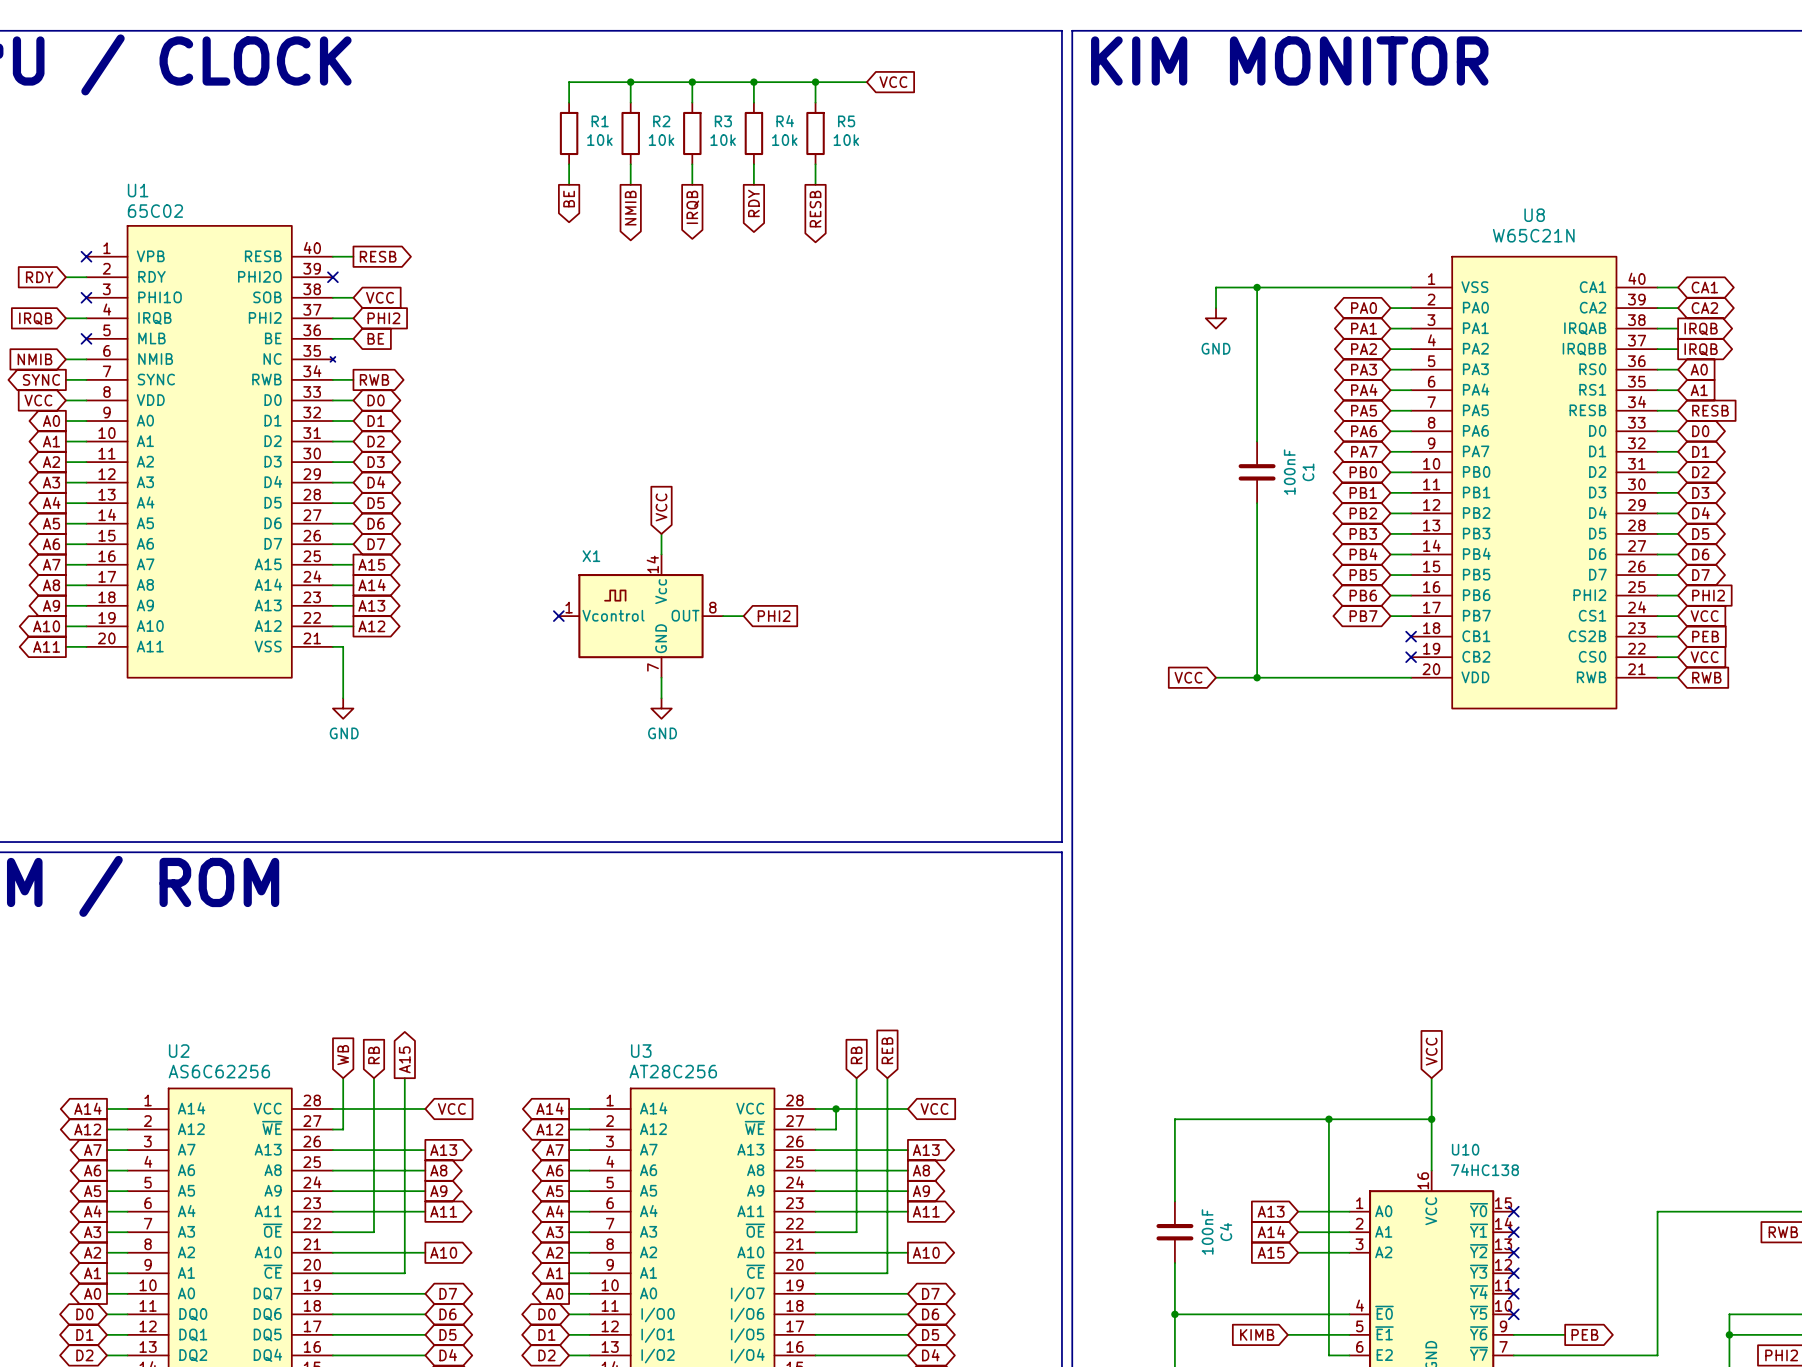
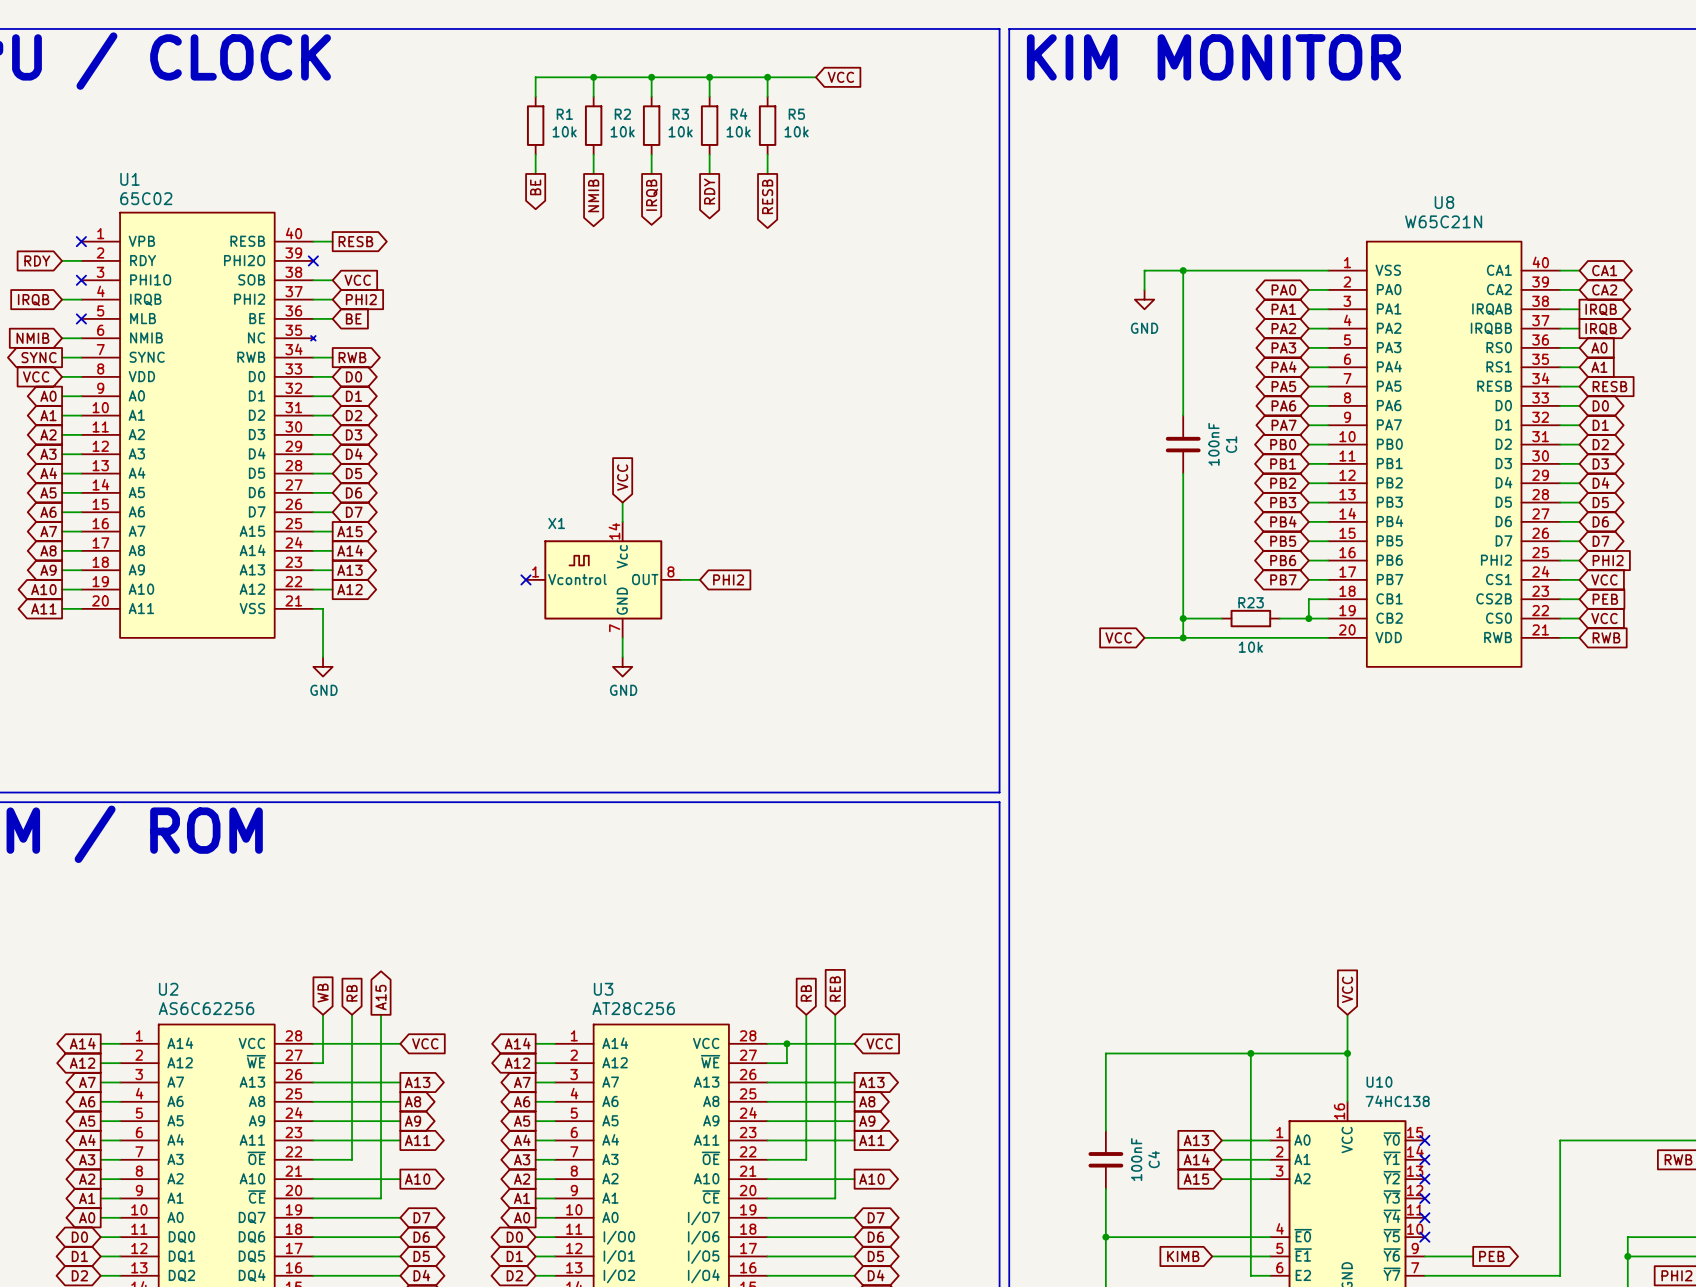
wire: none -> (1328, 599) (1308, 599) (1308, 618)
no-connect mark: (1411, 636) -> none
wire: none -> (1183, 618) (1221, 618)
junction: none -> (1183, 618)
R23: none -> 10k (1250, 618)
wire: none -> (1279, 618) (1328, 618)
junction: none -> (1308, 618)
no-connect mark: (1411, 657) -> none

